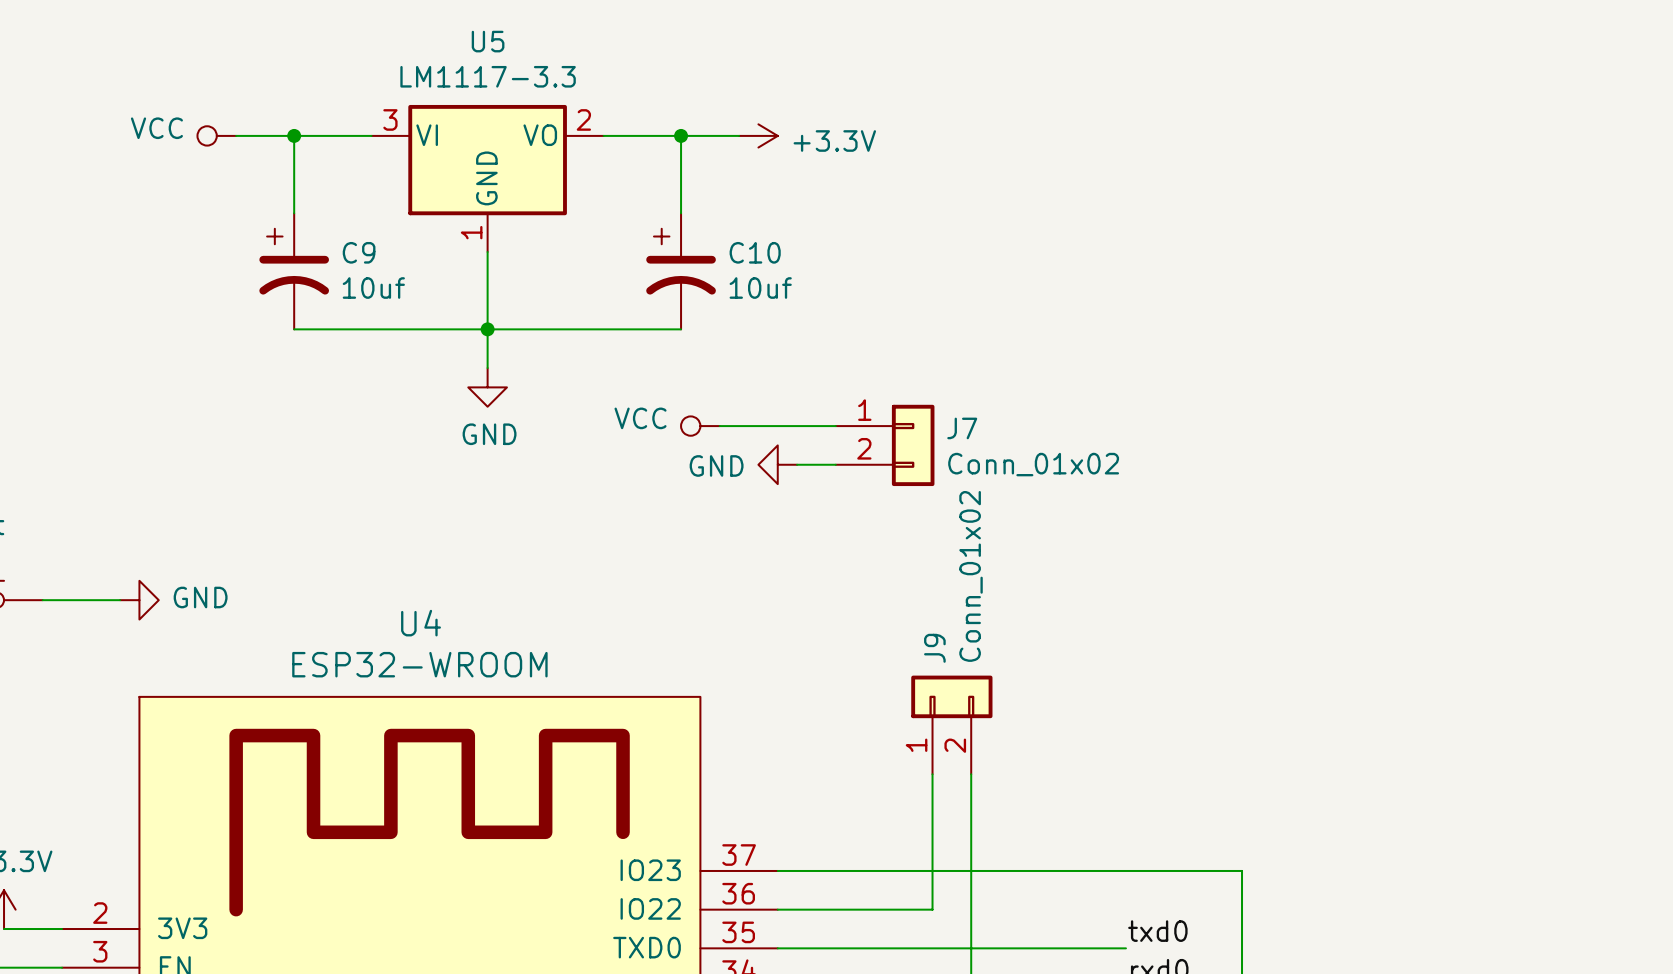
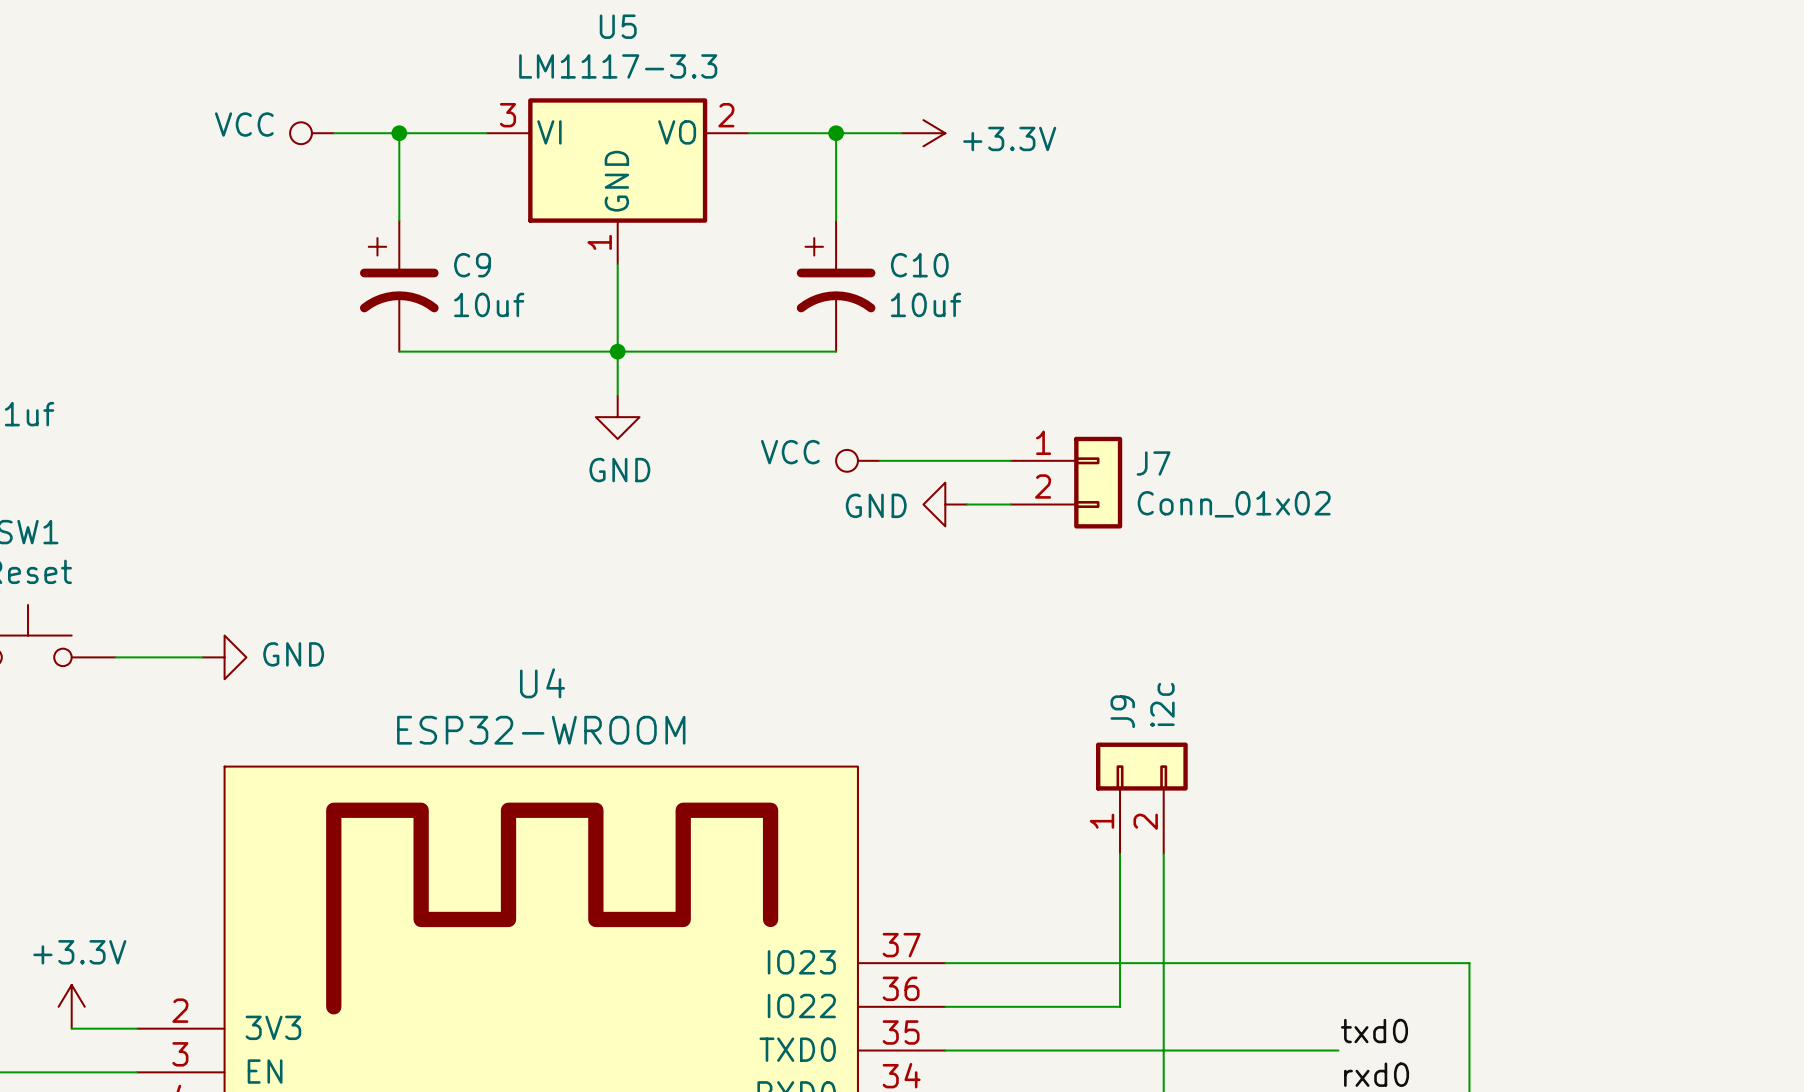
J9 value: Conn_01x02 (971, 576) -> i2c (1162, 704)

